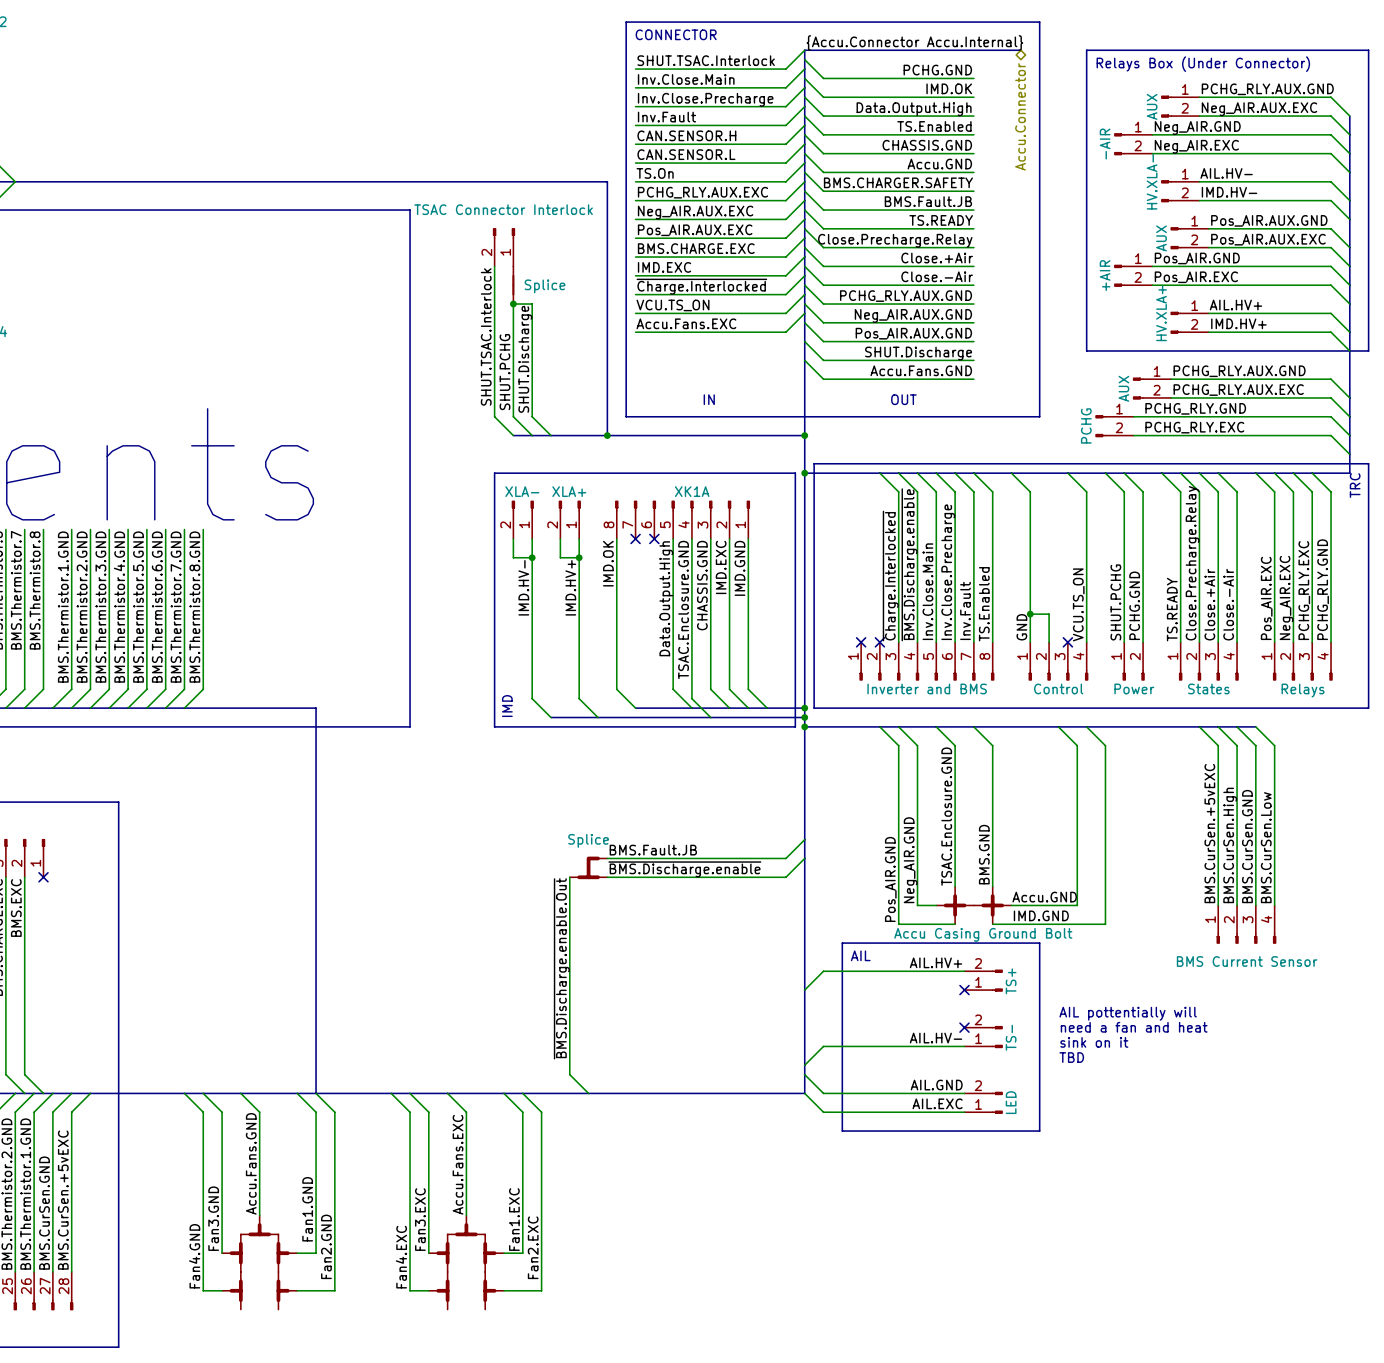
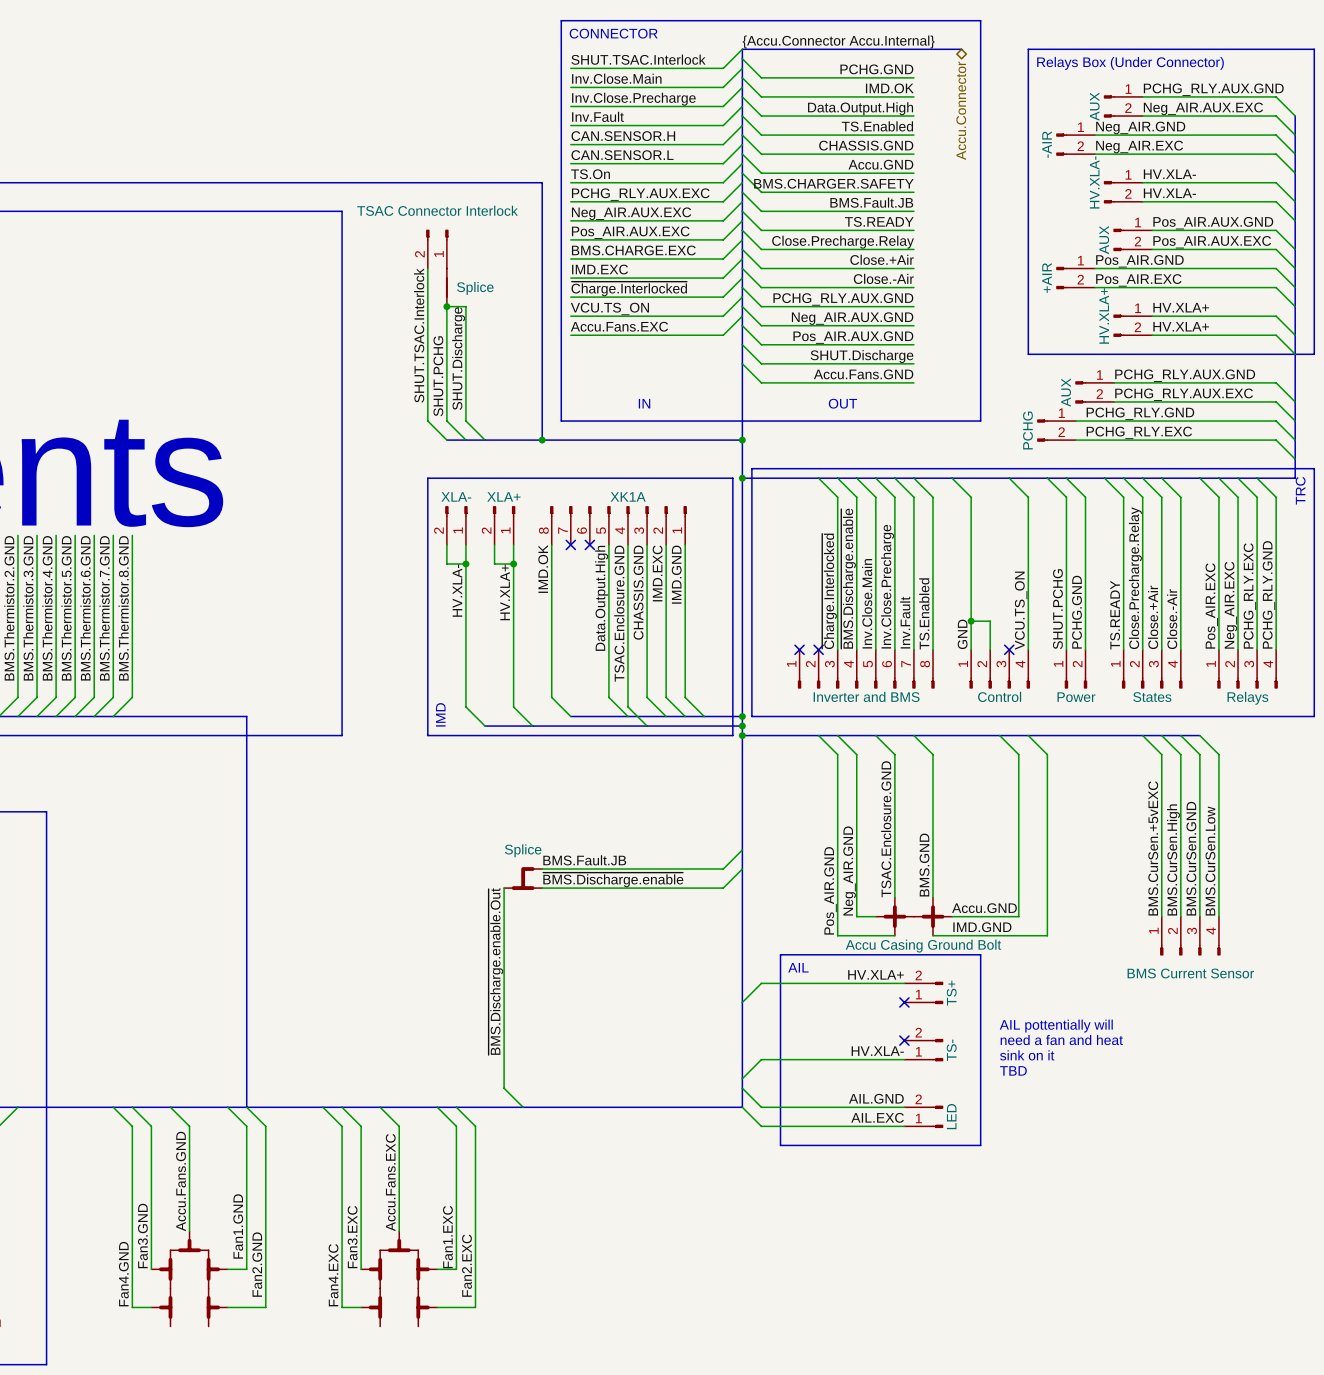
label: AIL.HV- (1226, 173) -> HV.XLA- (1169, 174)
label: IMD.HV- (1229, 192) -> HV.XLA- (1169, 193)
label: AIL.HV+ (1235, 305) -> HV.XLA+ (1181, 307)
label: IMD.HV+ (1238, 323) -> HV.XLA+ (1181, 326)
label: IMD.HV- (523, 587) -> HV.XLA- (457, 590)
label: IMD.HV+ (570, 587) -> HV.XLA+ (505, 592)
label: AIL.HV+ (936, 962) -> HV.XLA+ (875, 974)
label: AIL.HV- (936, 1038) -> HV.XLA- (877, 1051)

